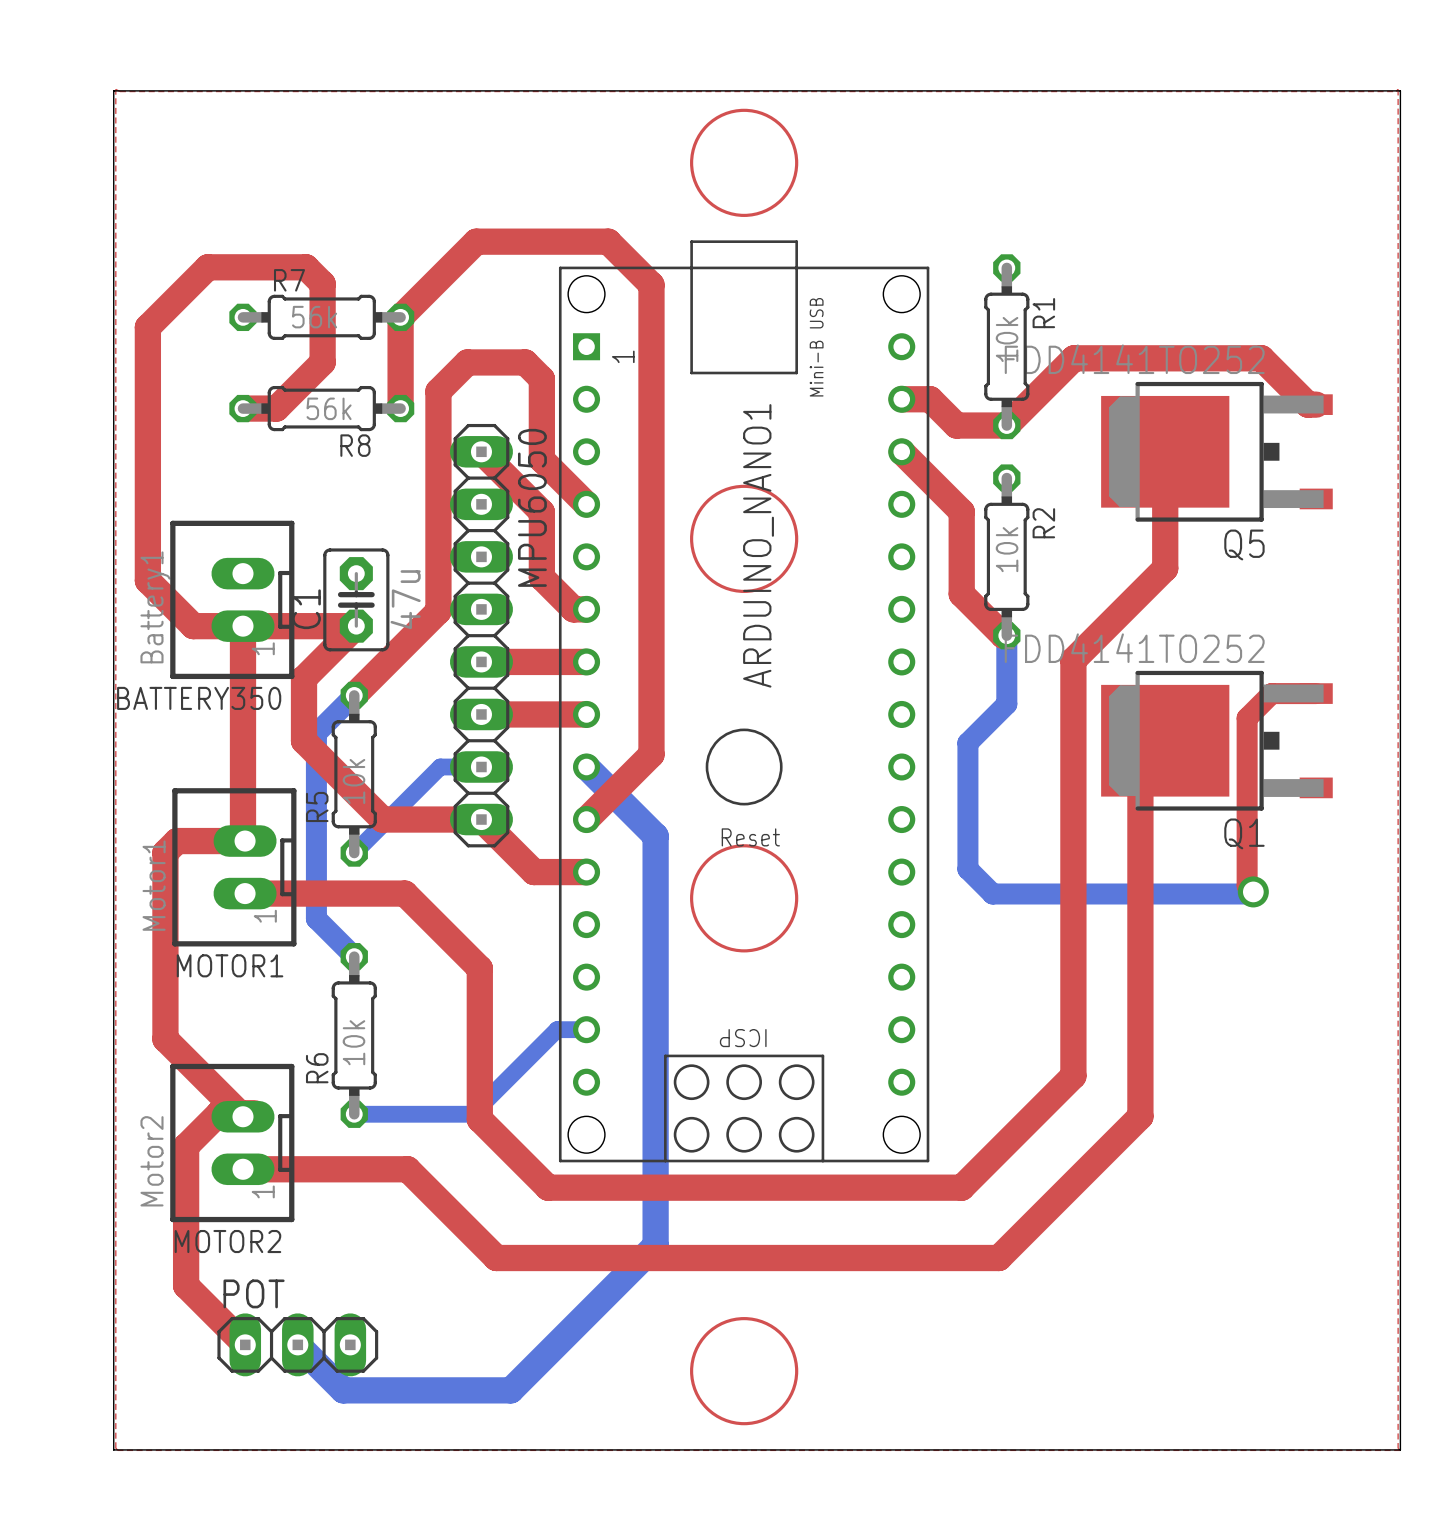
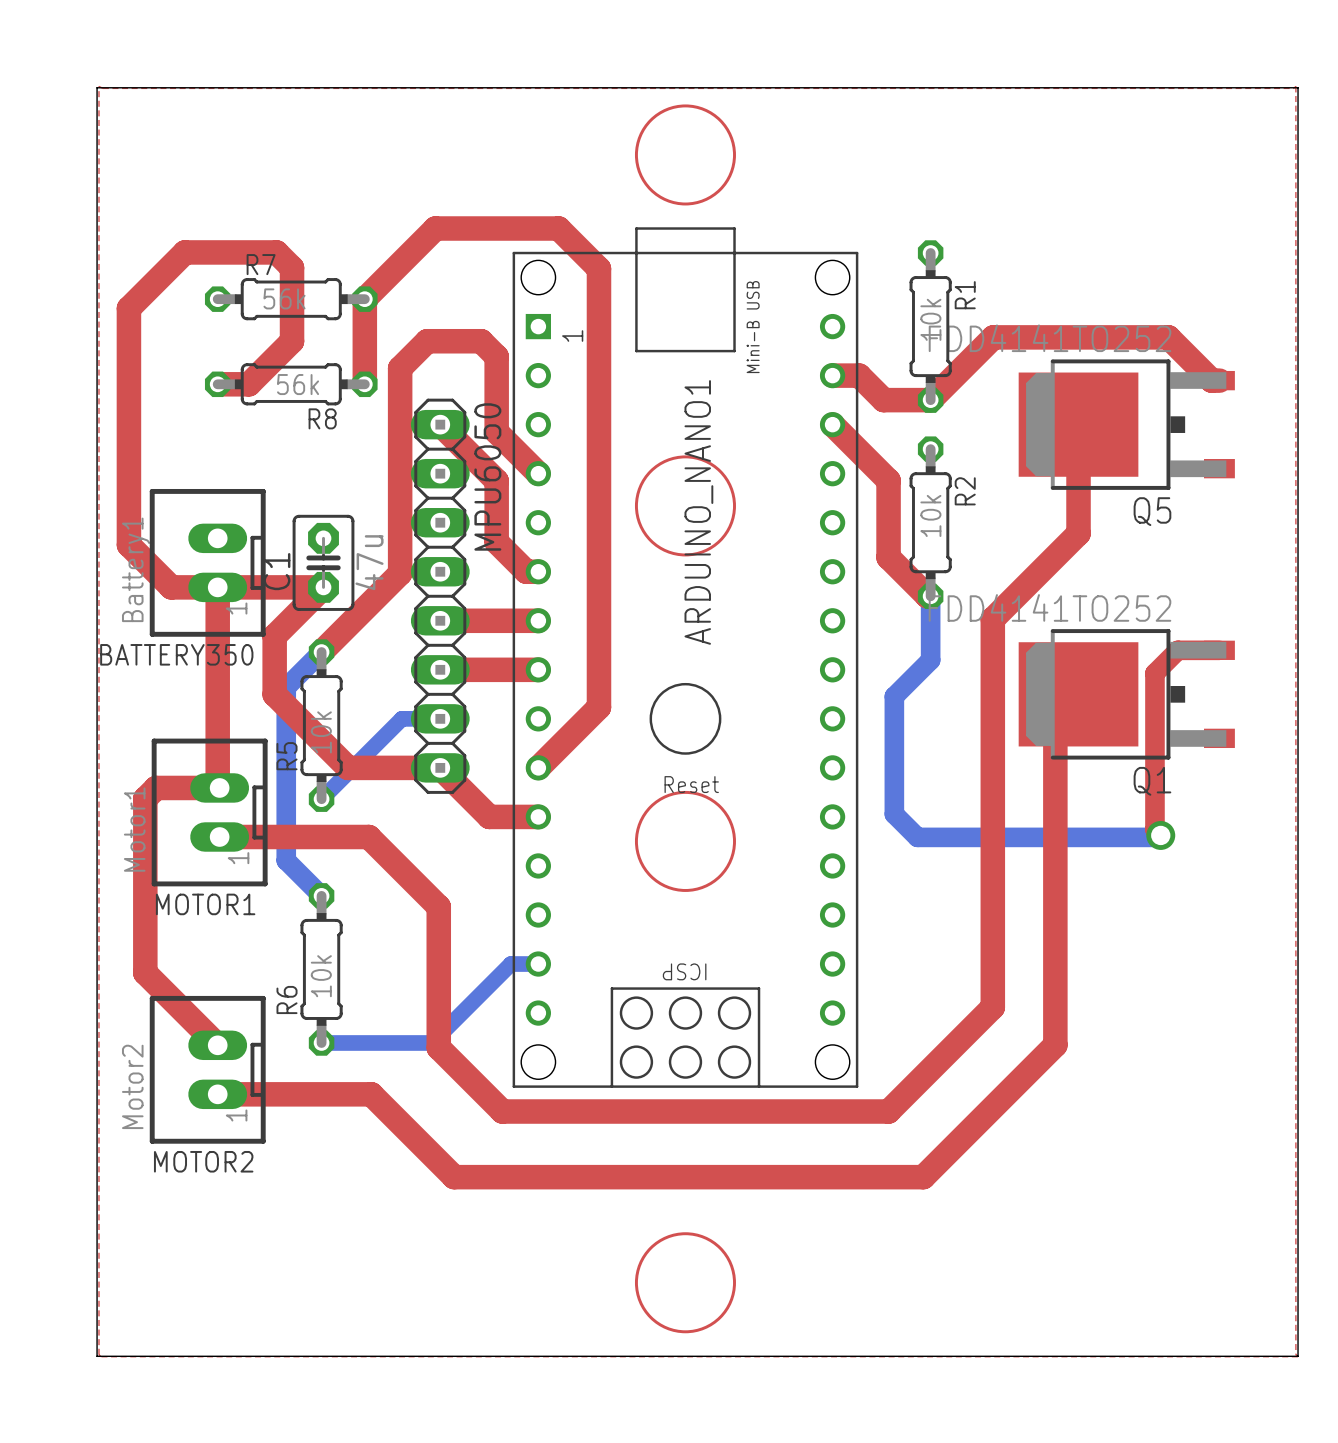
bottom track: (586, 767) (655, 836) (655, 1245) (510, 1390) (343, 1390) (297, 1344) -> none
top track: (254, 1113) (219, 1113) (186, 1146) (186, 1285) (245, 1344) -> none
POT: (297, 1344) -> none

